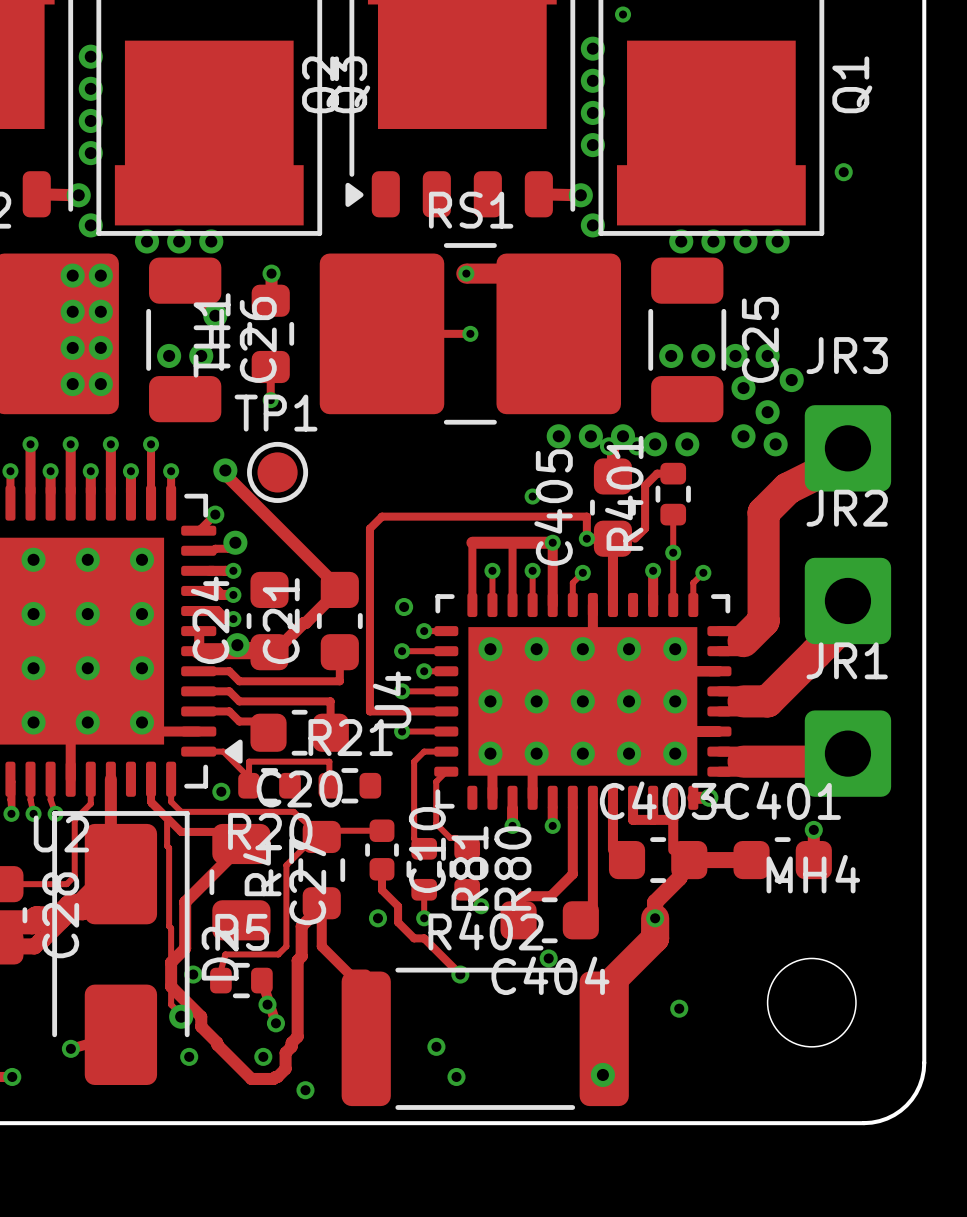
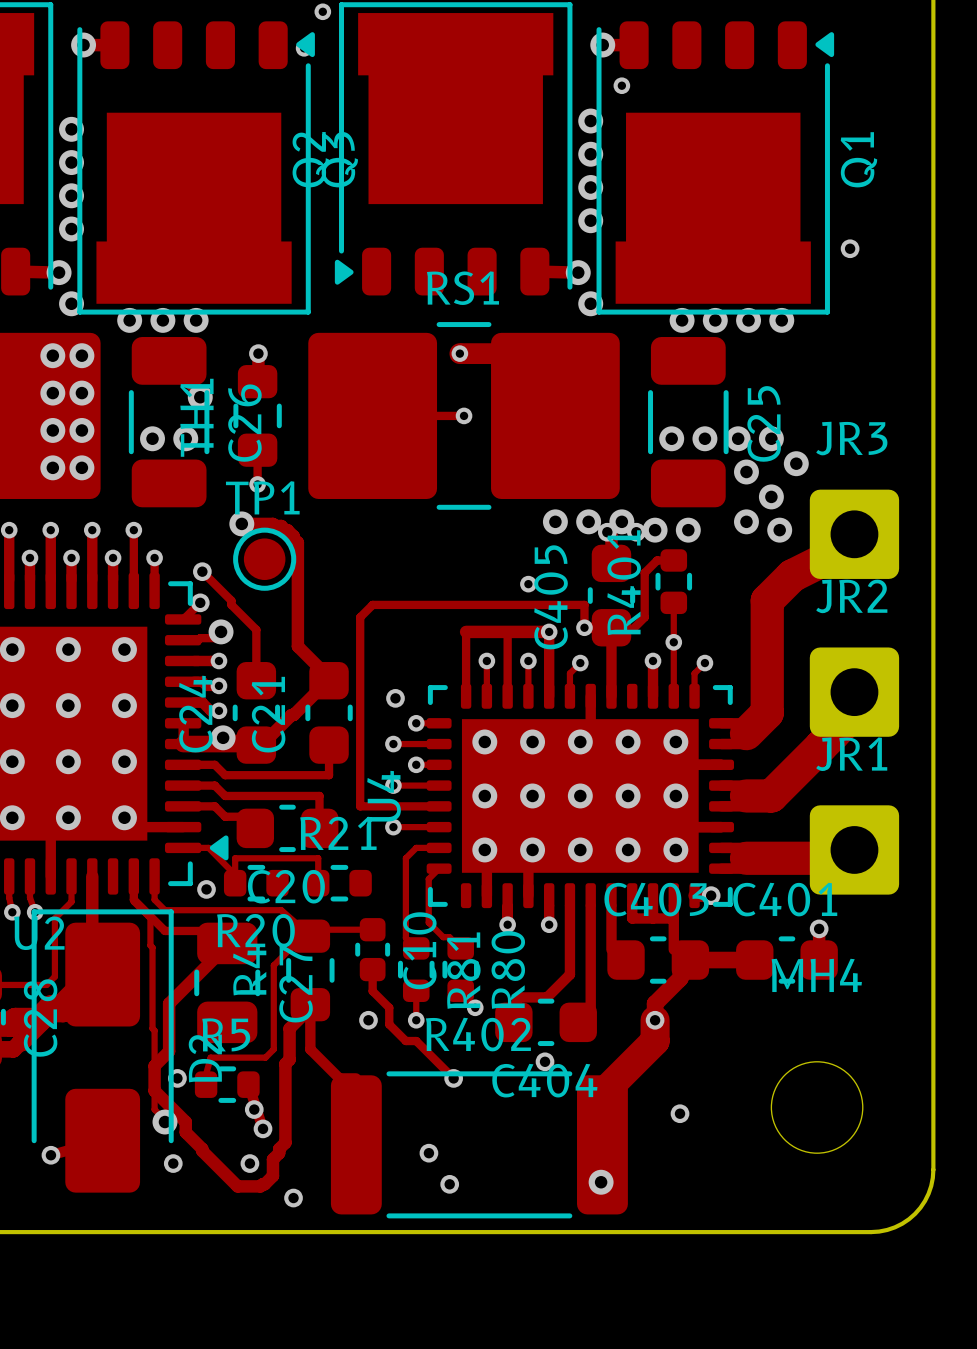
track: (225, 470) (225, 474) (339, 589) -> (241, 523) (272, 523) (275, 525) (281, 525) (297, 542) (297, 646) (329, 677) (329, 680)
via position: (225, 470) -> (241, 523)
track: none -> (202, 571) (231, 600) (231, 604) (256, 629) (256, 680)
via: none -> (202, 571)

